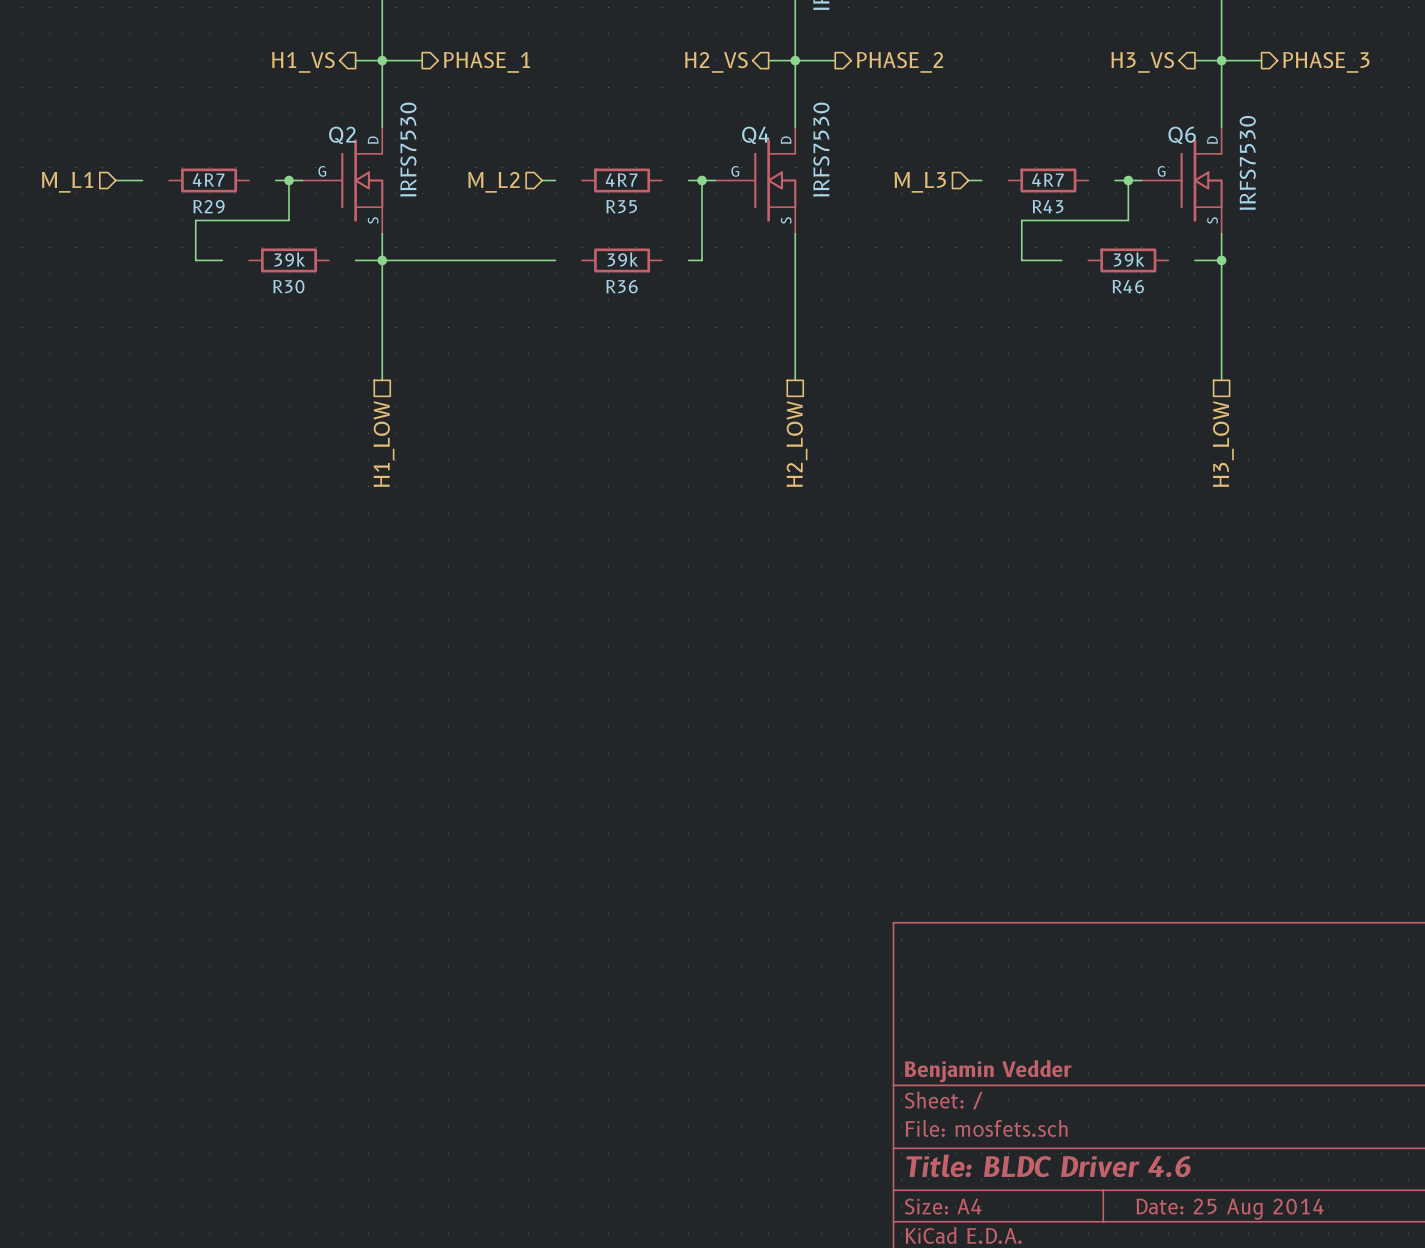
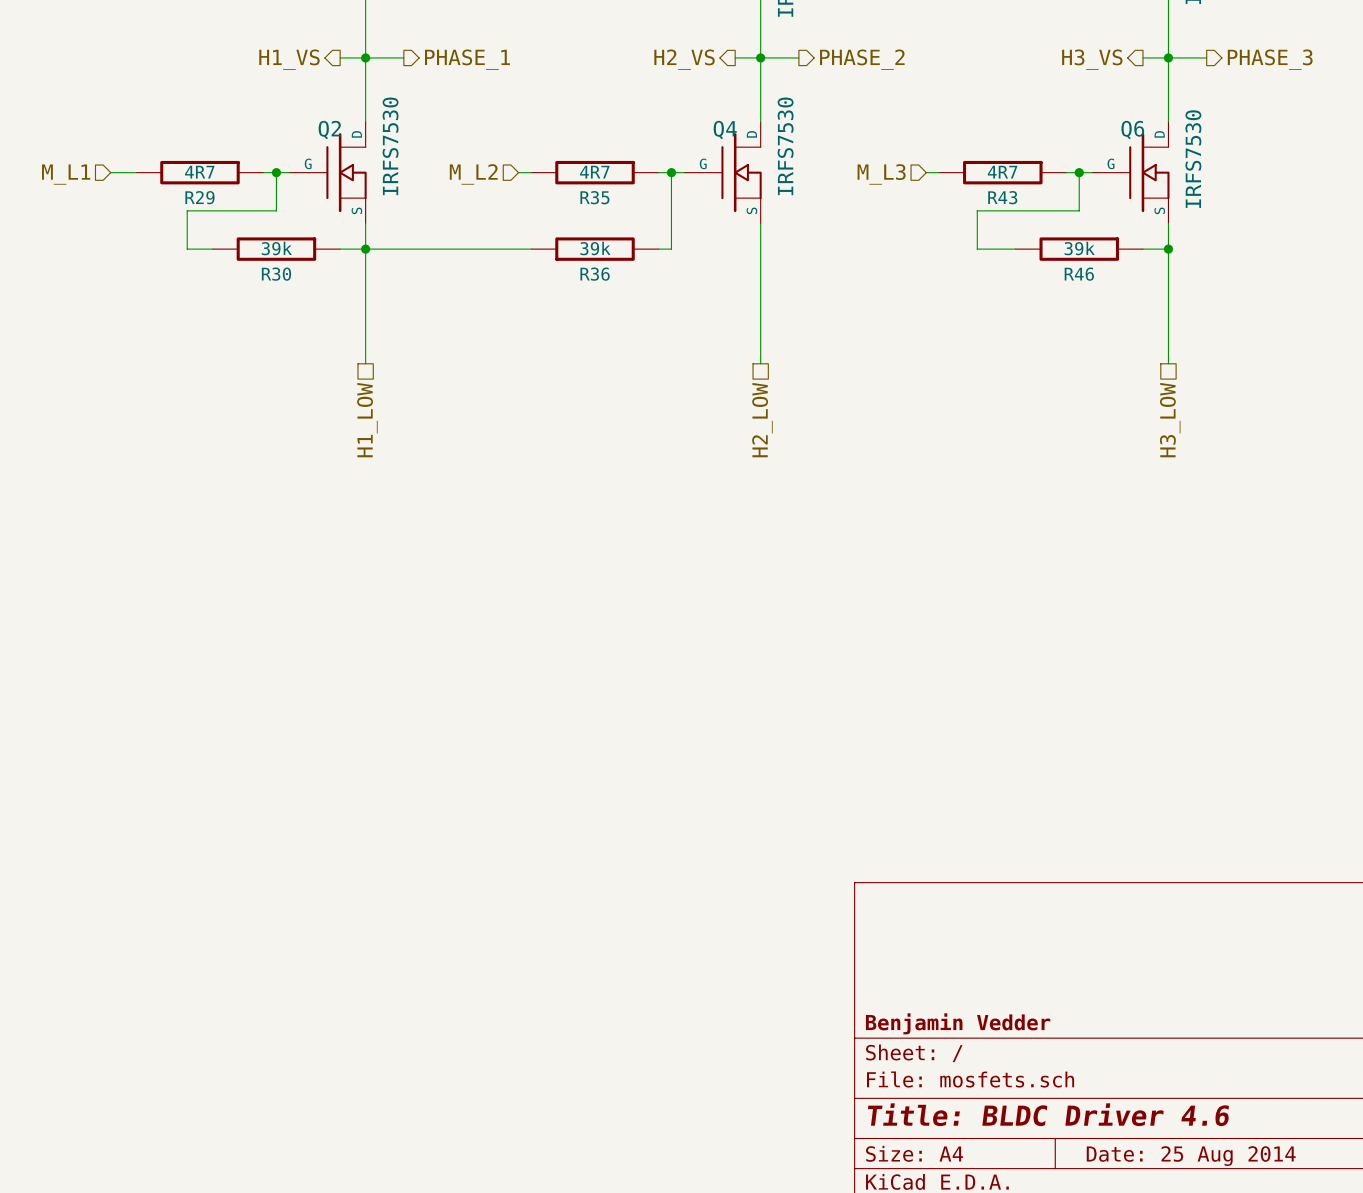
R29 symbol: [169, 168, 250, 193] -> [136, 160, 264, 185]
R35 symbol: [582, 168, 663, 193] -> [531, 160, 659, 185]
R43 symbol: [1008, 168, 1089, 193] -> [939, 160, 1067, 185]
R30 symbol: [249, 248, 329, 273] -> [212, 237, 341, 261]
R36 symbol: [582, 248, 663, 273] -> [531, 237, 659, 261]
R46 symbol: [1088, 248, 1169, 273] -> [1015, 237, 1143, 261]

